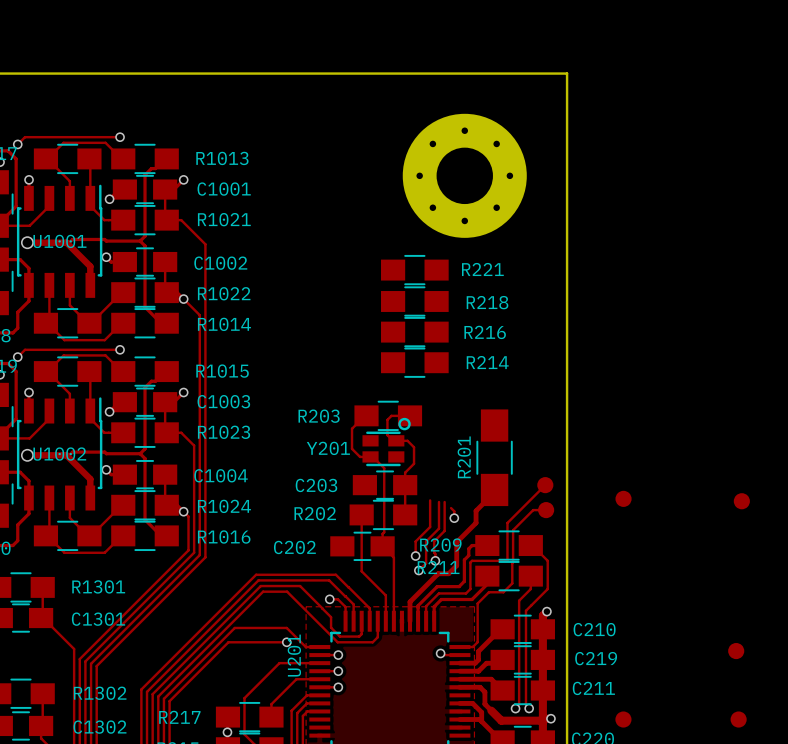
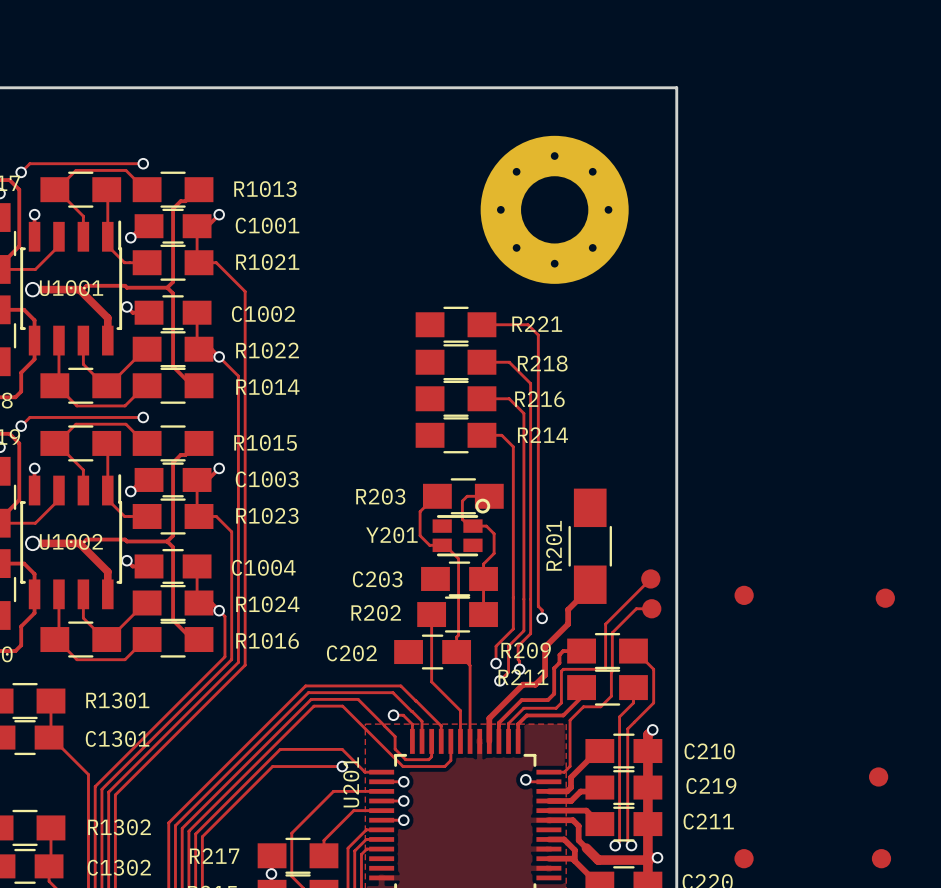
R221 position: (414, 270) -> (456, 324)
track: none -> (481, 324) (527, 324) (538, 335) (538, 606)
R218 position: (414, 301) -> (456, 362)
track: none -> (481, 362) (509, 362) (530, 383) (530, 599)
R216 position: (414, 332) -> (456, 398)
track: none -> (481, 398) (509, 398) (523, 413) (523, 599)
R214 position: (414, 362) -> (456, 435)
track: none -> (481, 435) (501, 435) (513, 446) (513, 597)

